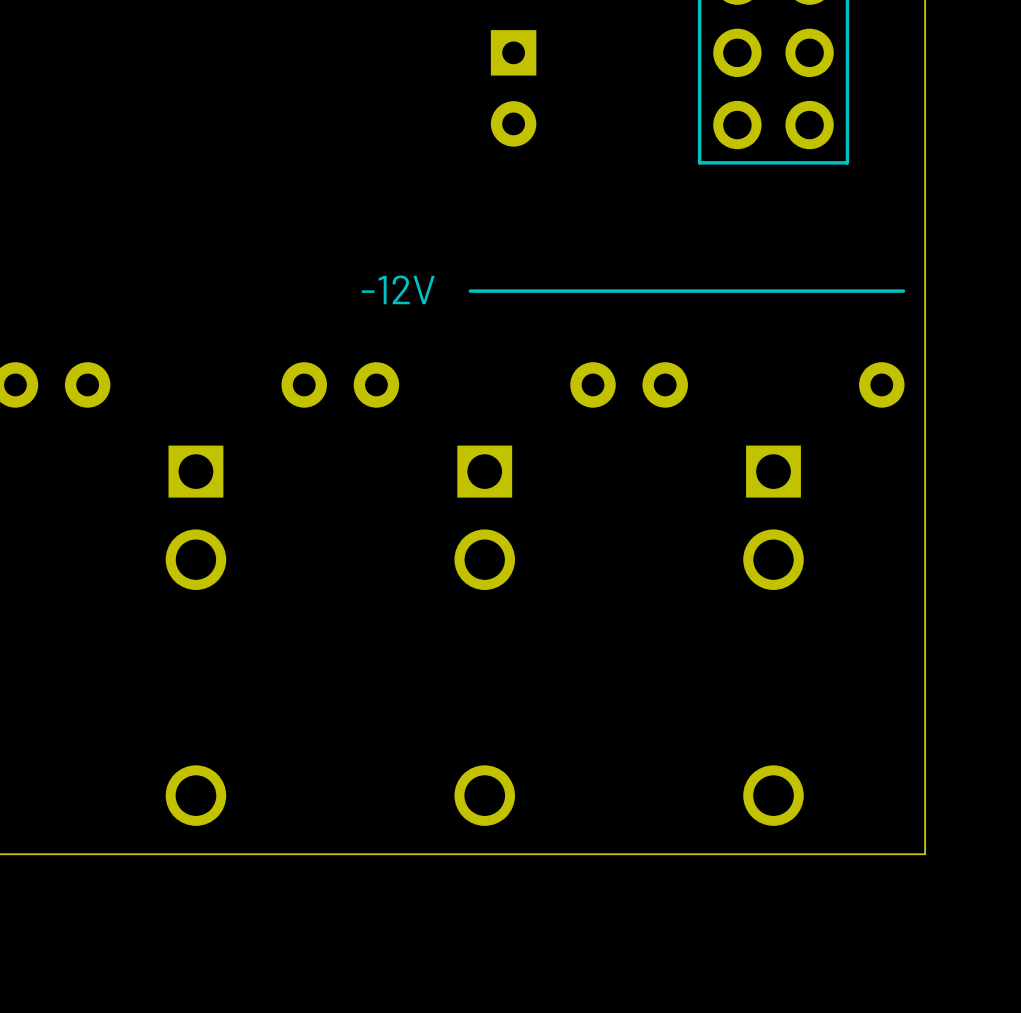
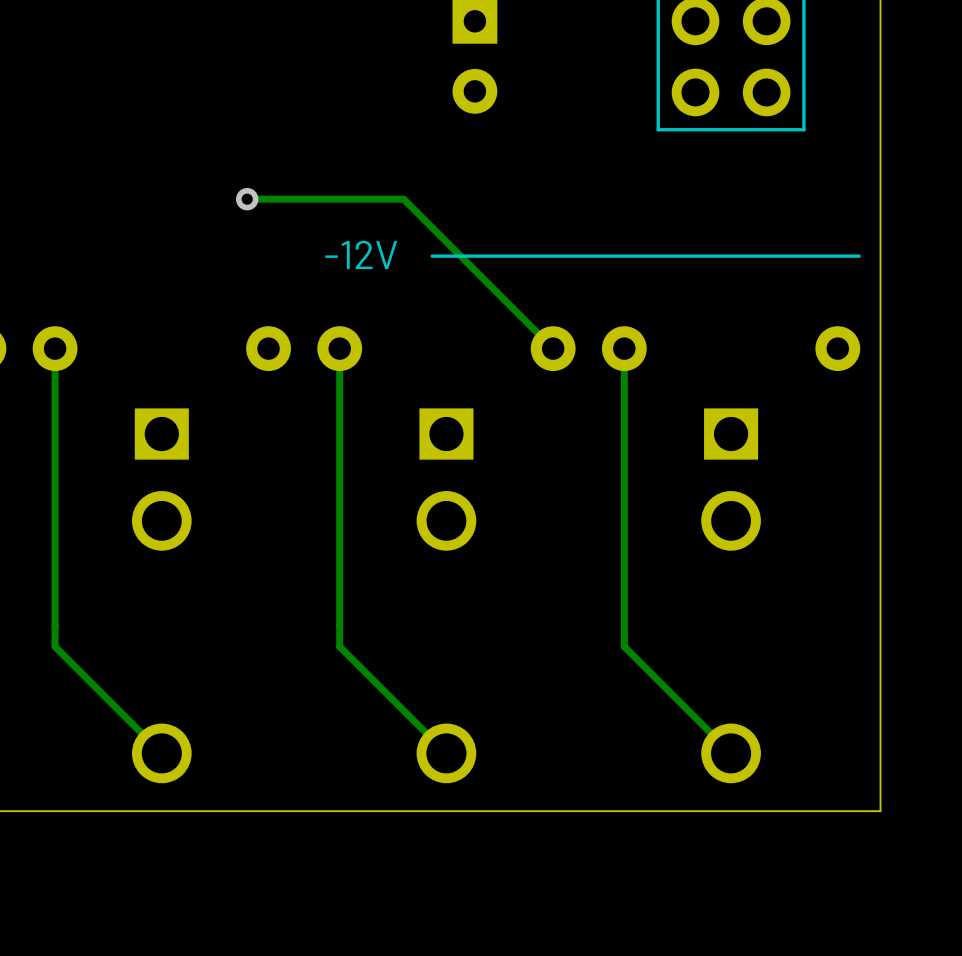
track: none -> (247, 199) (403, 199) (553, 348)
via: none -> (247, 199)
track: none -> (55, 348) (55, 646) (161, 753)
track: none -> (339, 348) (339, 646) (446, 753)
track: none -> (624, 348) (624, 646) (731, 753)

